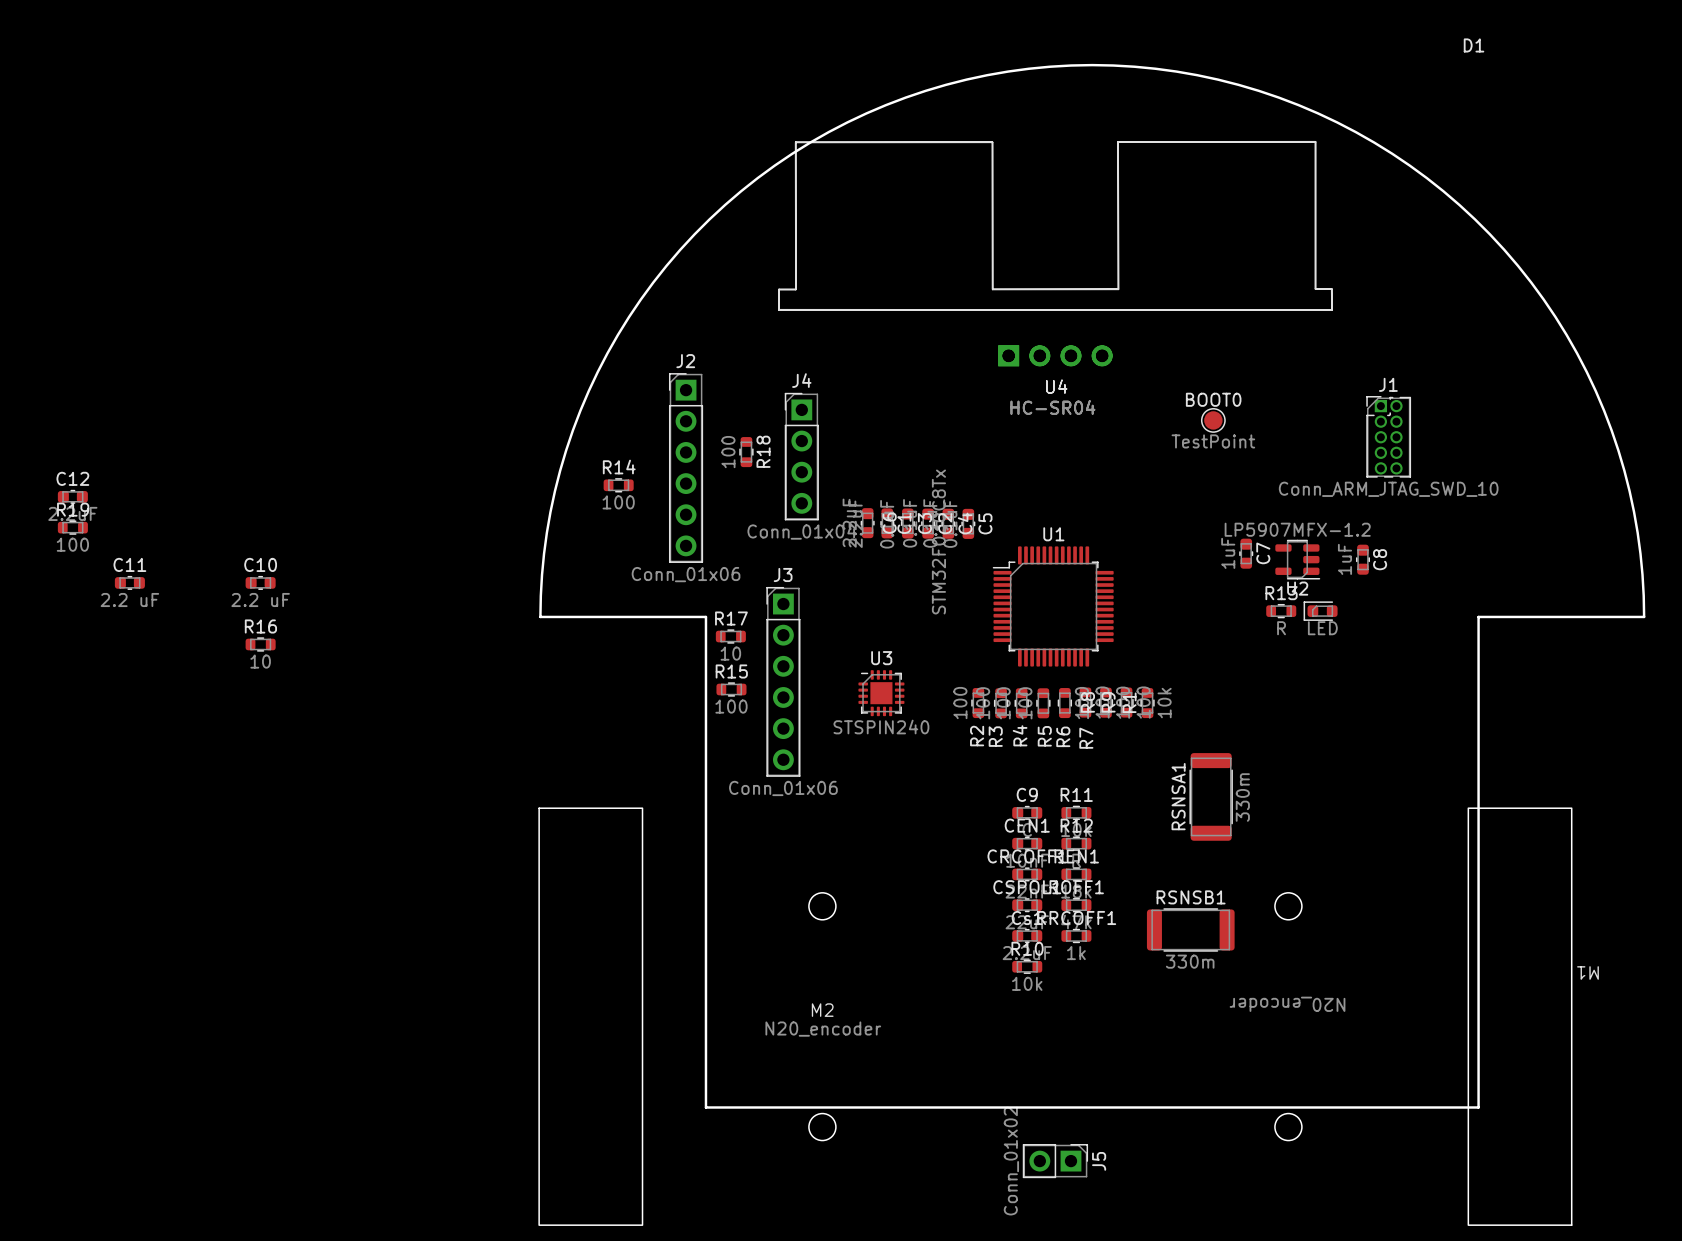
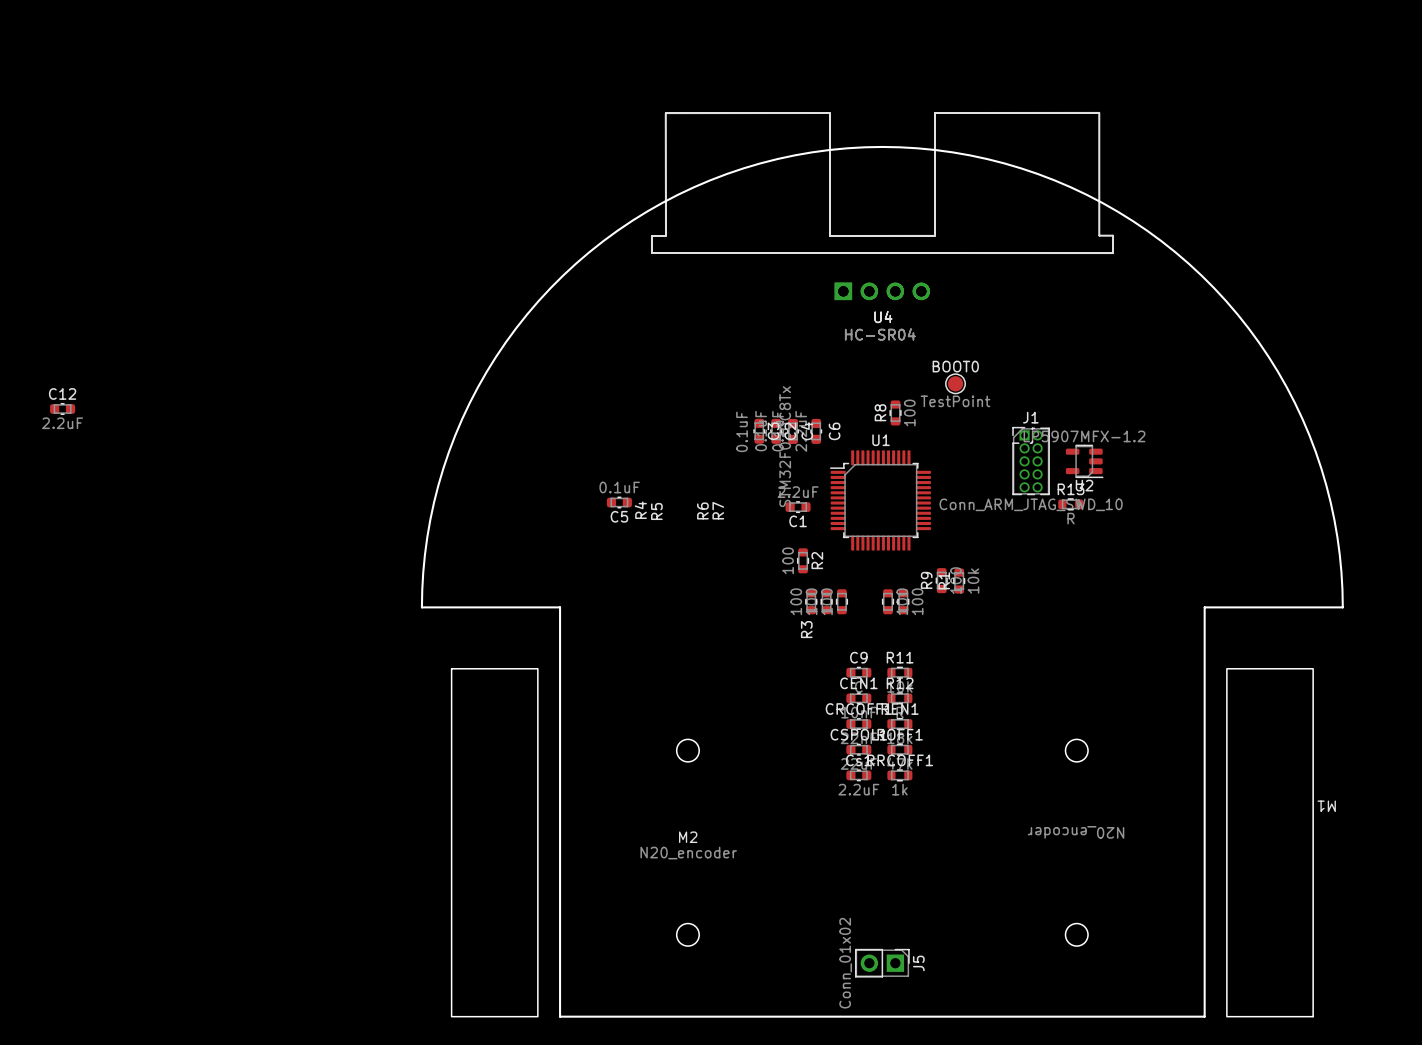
BOOT0 position: (1213, 420) -> (955, 383)
J1 position: (1388, 436) -> (1031, 461)
R18: 100 (746, 452) -> none
J4: Conn_01x04 (801, 456) -> none
J2: Conn_01x06 (686, 468) -> none
R14: 100 (618, 485) -> none
C6 position: (867, 523) -> (816, 431)
C1 rotation: 0° (887, 523) -> 90° clockwise (798, 507)
C1 position: (887, 523) -> (798, 507)
C5 rotation: 0° (968, 523) -> 90° clockwise (619, 502)
C5 position: (968, 523) -> (619, 502)
R19: 100 (72, 527) -> none
C7: 1uF (1246, 553) -> none
C8: 1uF (1362, 559) -> none
C11: 2.2 uF (129, 582) -> none
C10: 2.2 uF (260, 582) -> none
D1: LED (1320, 611) -> none
board edge: (540, 616) (705, 616) (705, 1107) (1478, 1107) (1478, 616) (1644, 616) (1640, 553) (1634, 511) (1624, 470) (1604, 410) (1577, 353) (1555, 316) (1531, 282) (1489, 234) (1443, 191) (1409, 165) (1374, 142) (1318, 113) (1258, 90) (1218, 79) (1155, 68) (1092, 65) (1028, 68) (987, 75) (946, 84) (885, 105) (828, 132) (774, 165) (725, 204) (694, 234) (666, 265) (629, 316) (607, 353) (580, 410) (560, 470) (550, 511) (542, 574) (540, 616) -> (421, 607) (560, 607) (560, 1016) (1204, 1016) (1204, 607) (1342, 607) (1339, 554) (1334, 519) (1326, 485) (1309, 435) (1294, 403) (1268, 357) (1248, 328) (1214, 288) (1175, 252) (1132, 220) (1102, 202) (1054, 180) (1004, 163) (970, 155) (935, 149) (882, 146) (847, 148) (794, 155) (760, 163) (710, 180) (662, 202) (632, 220) (589, 252) (563, 275) (527, 314) (505, 342) (486, 372) (462, 419) (449, 451) (434, 502) (424, 554) (421, 607)
R17: 10 (730, 636) -> none
R16: 10 (260, 644) -> none
J3: Conn_01x06 (783, 681) -> none
R15: 100 (731, 689) -> none
U3: STSPIN240 (881, 693) -> none
R7 position: (1085, 702) -> (903, 601)
R8 position: (1105, 702) -> (895, 412)
R2 position: (978, 703) -> (803, 560)
R3 position: (1001, 703) -> (811, 601)
R4 position: (1021, 703) -> (826, 601)
R5 position: (1043, 703) -> (841, 601)
R6 position: (1064, 703) -> (887, 601)
R4 name position: R4 (1020, 735) -> R4 (640, 510)
R2 name position: R2 (977, 736) -> R2 (817, 560)
R5 name position: R5 (1044, 736) -> R5 (656, 511)
R6 name position: R6 (1063, 736) -> R6 (702, 510)
R7 name position: R7 (1086, 738) -> R7 (718, 510)
RSNSA1: 330m (1211, 796) -> none
RSNSB1: 330m (1190, 929) -> none
R10: 10k (1027, 966) -> none

